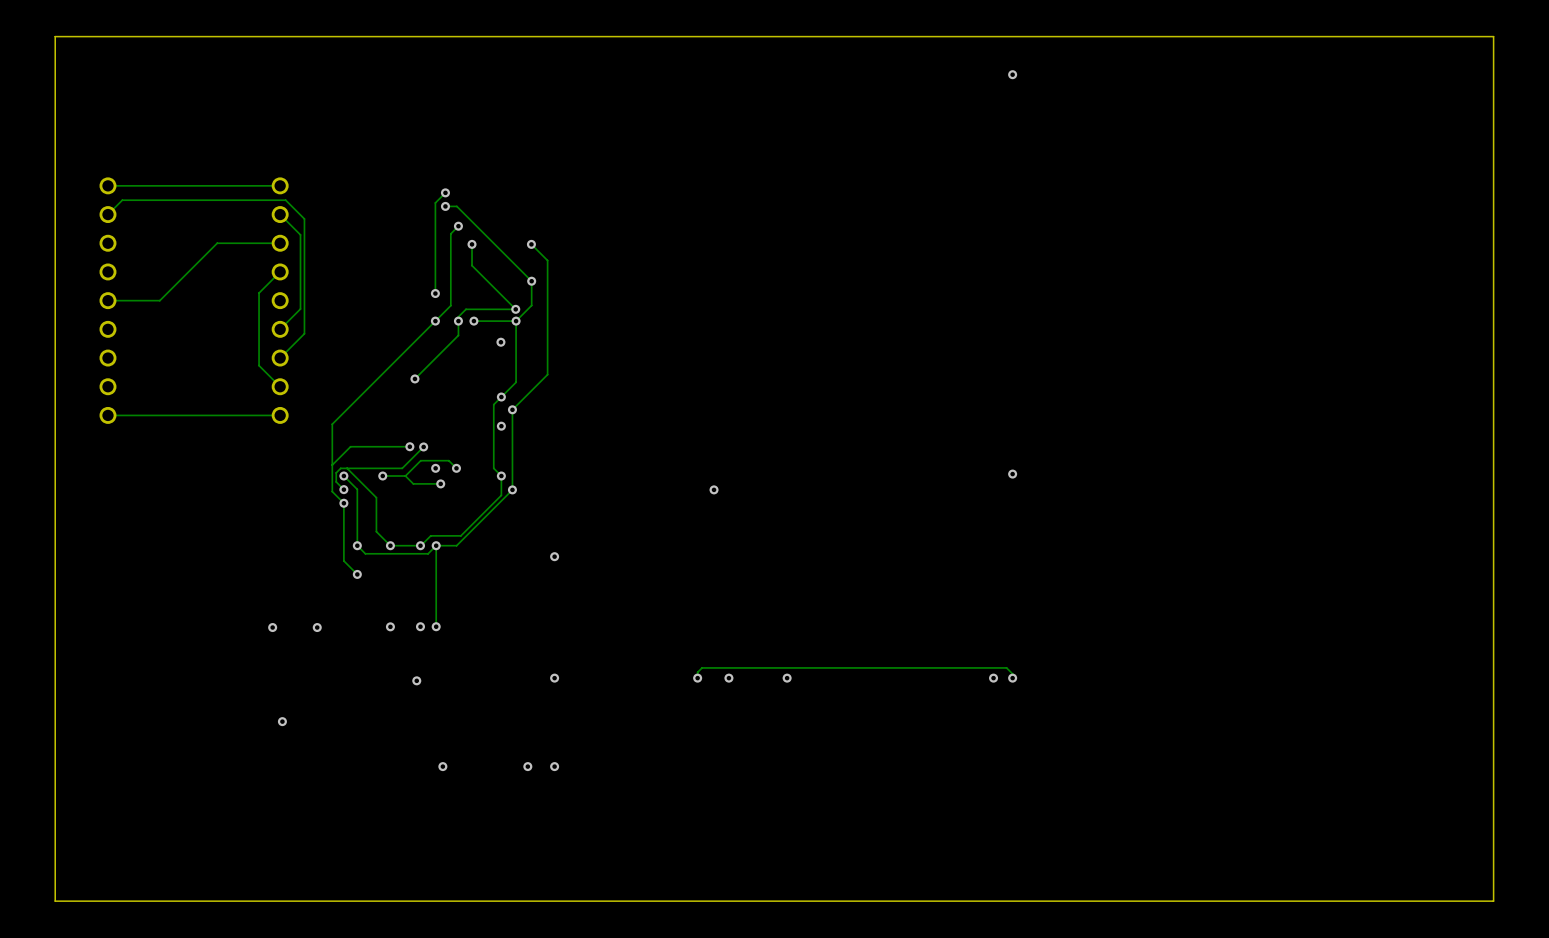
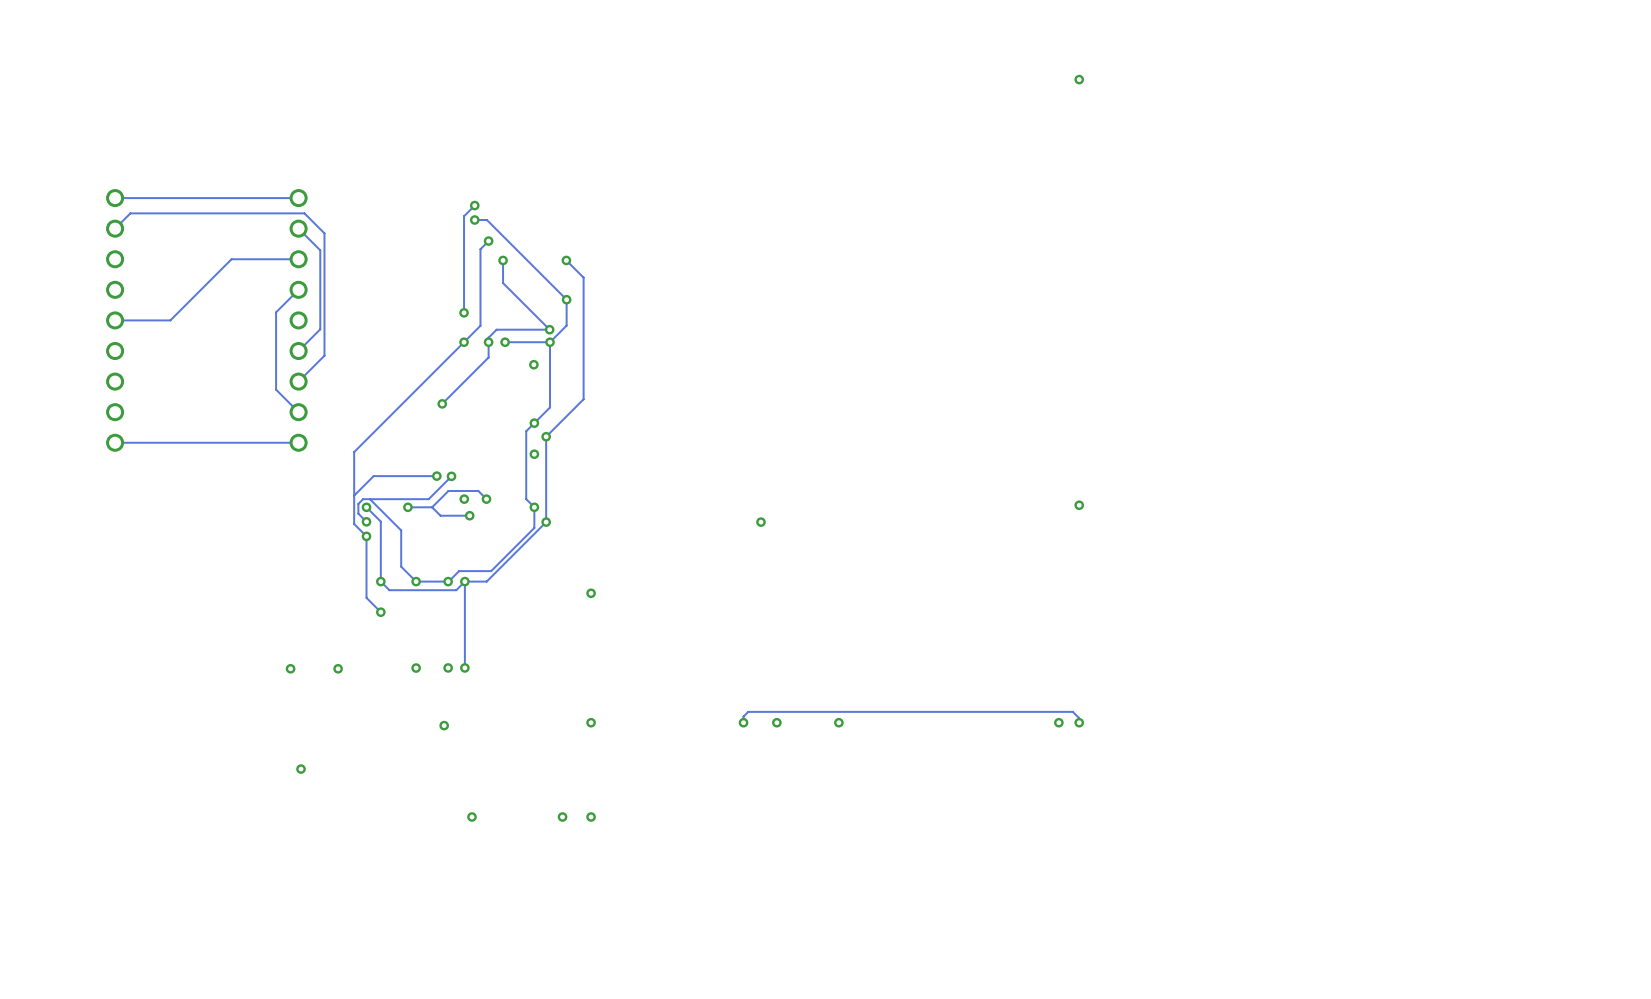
board edge: (1493, 36) (55, 36) (55, 901) (1493, 901) (1493, 36) -> none

